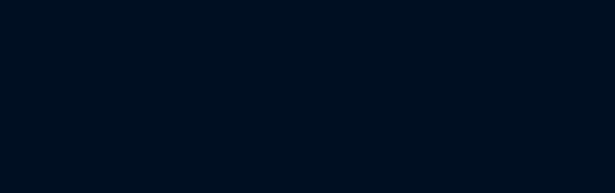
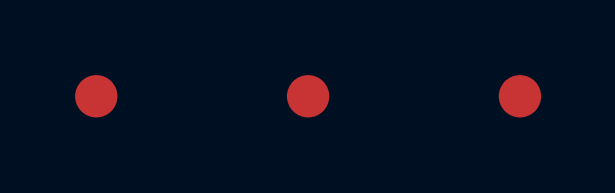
part: none -> (96, 96)
part: none -> (308, 96)
part: none -> (519, 96)

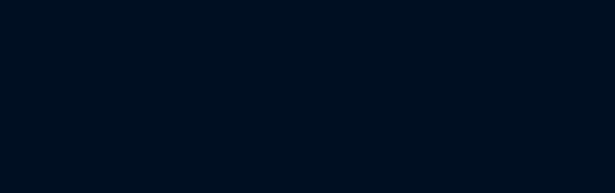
part: (96, 96) -> none
part: (308, 96) -> none
part: (519, 96) -> none

